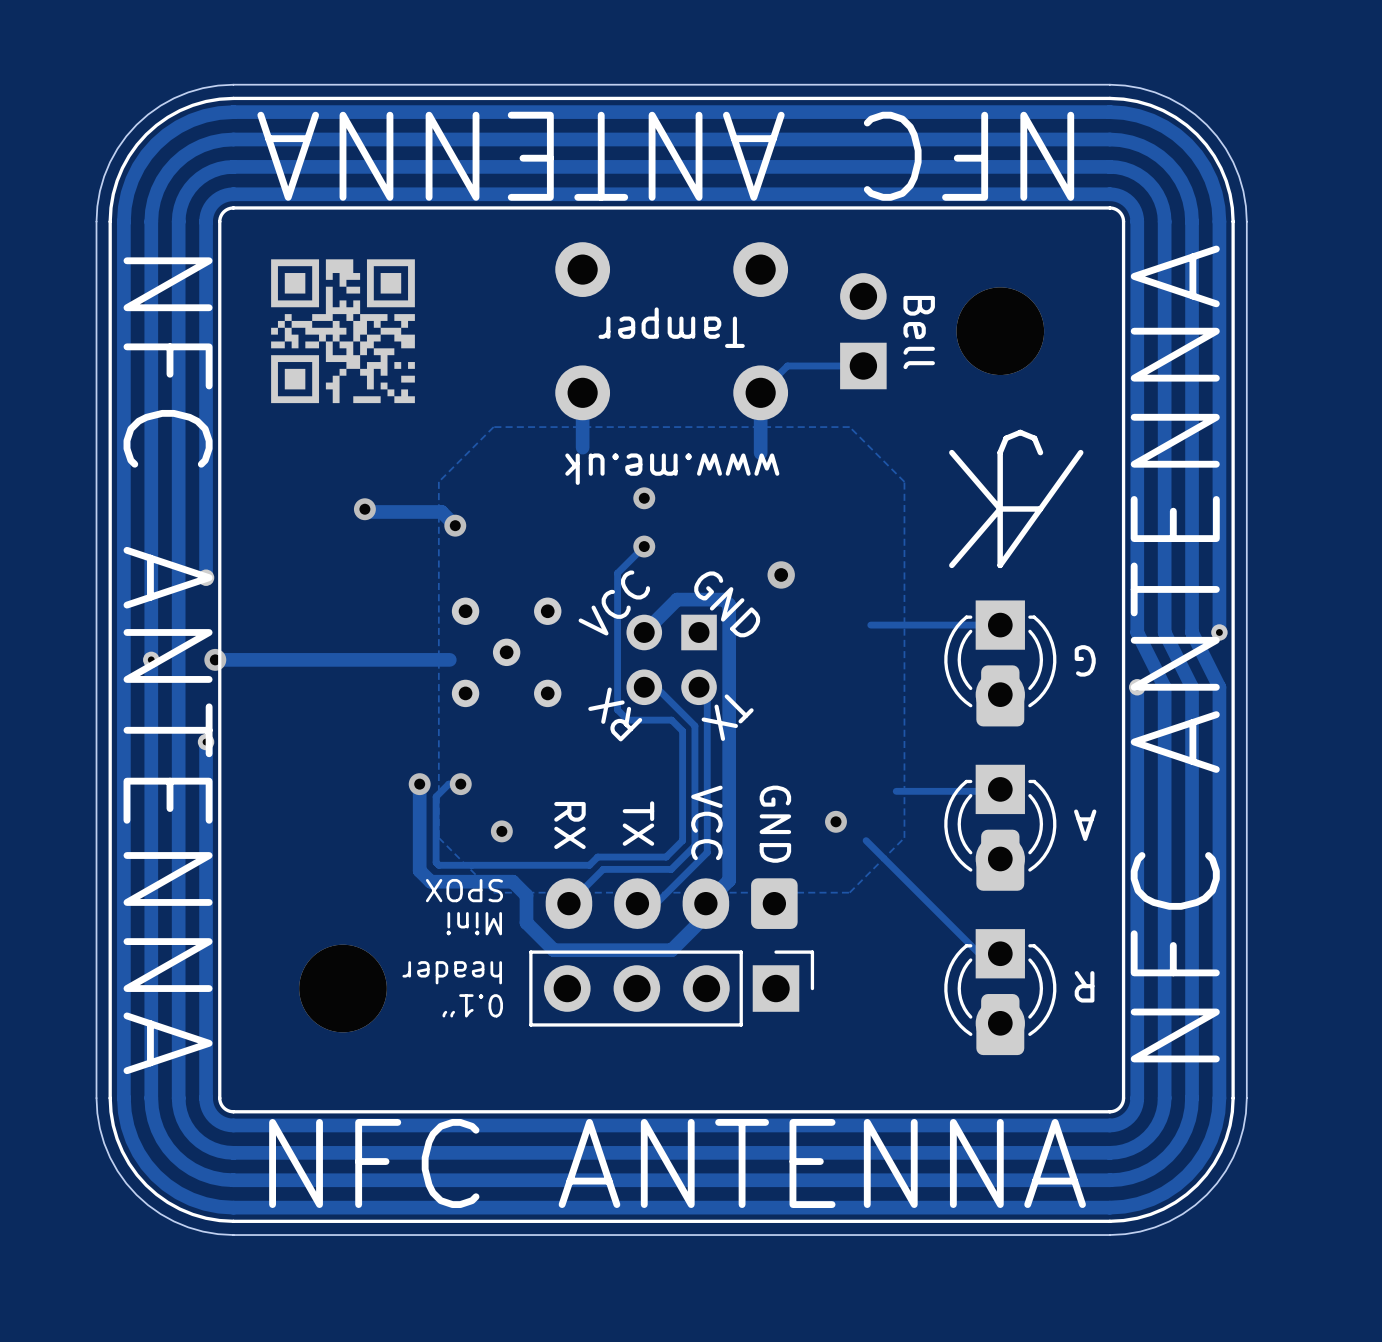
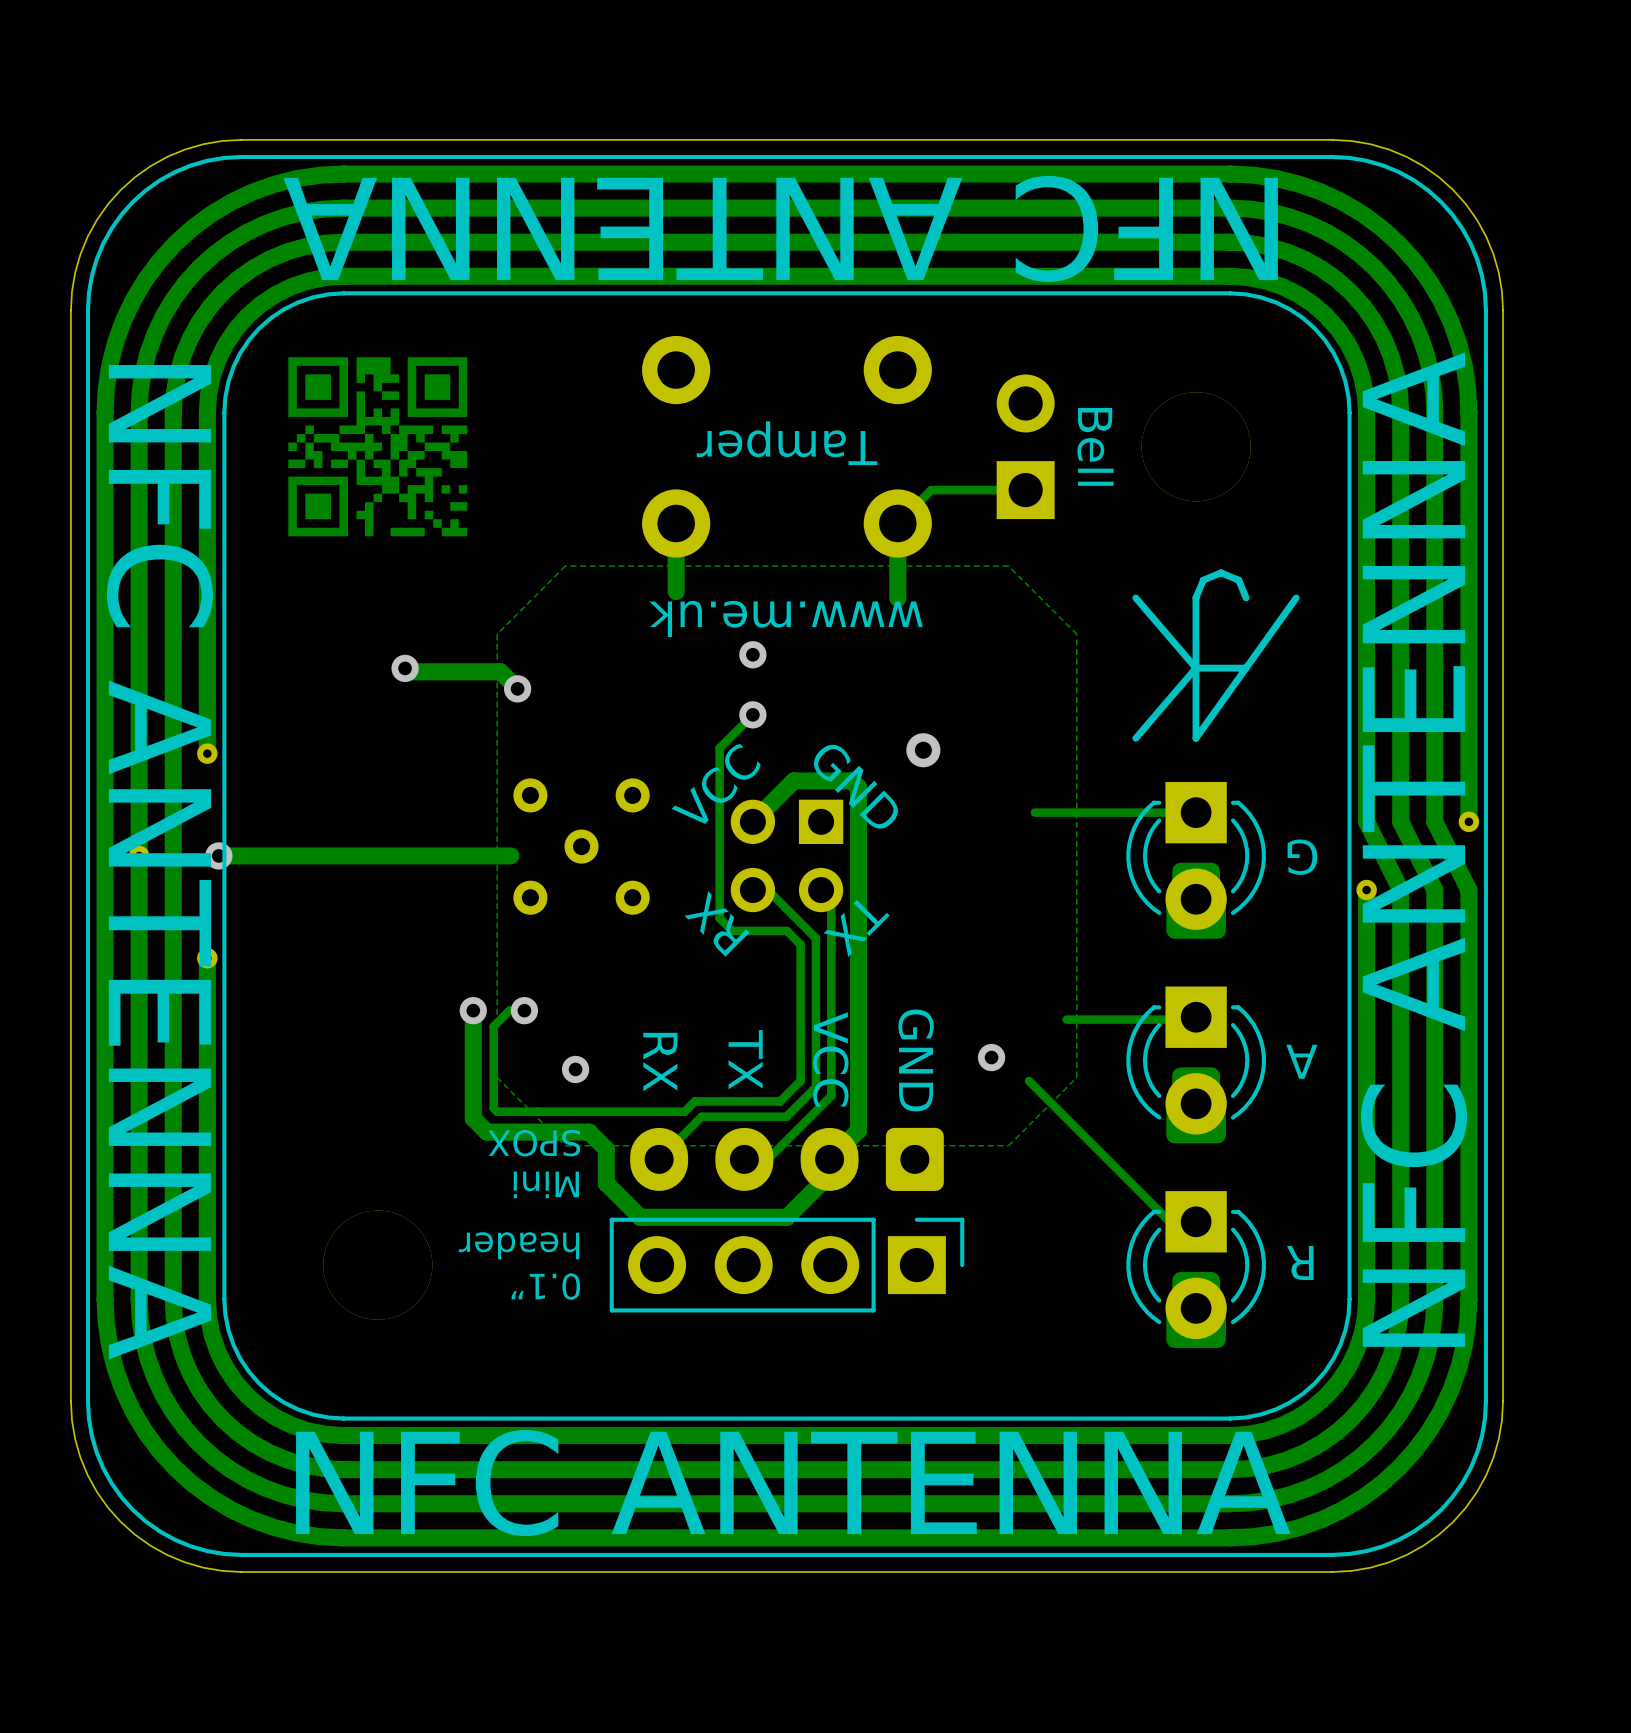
part footprint: [108, 96, 1235, 1223] -> [85, 154, 1489, 1557]

